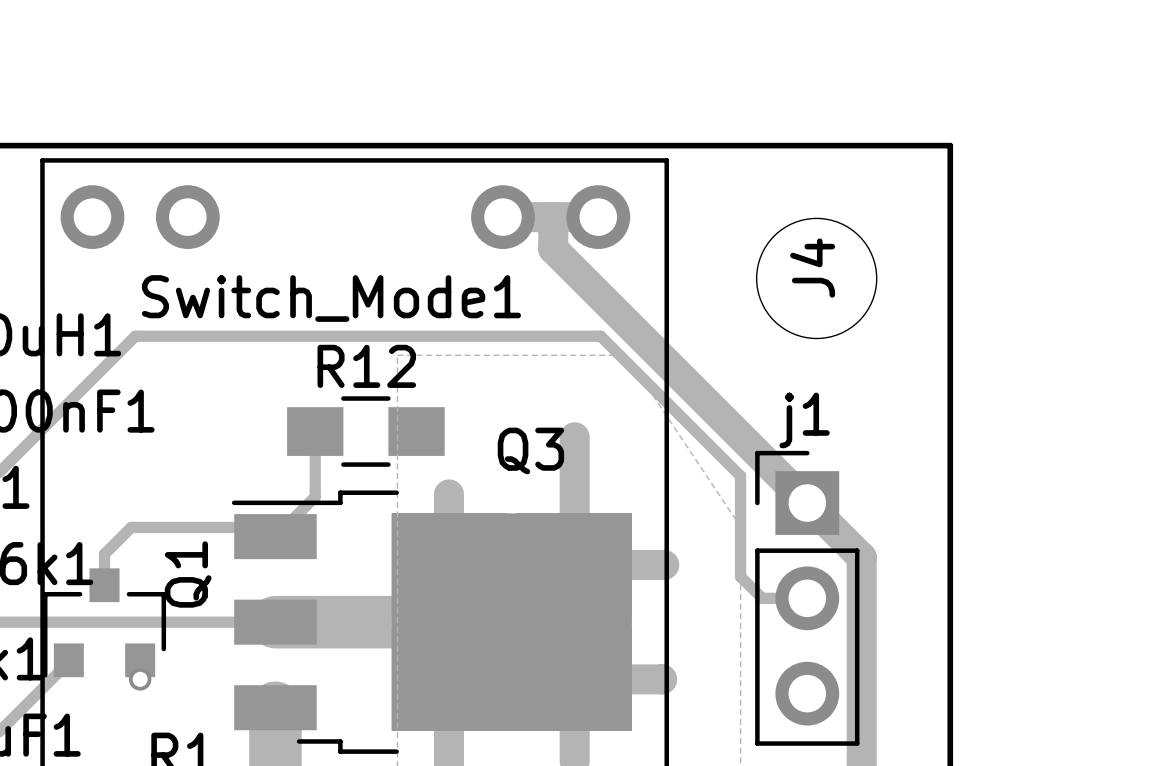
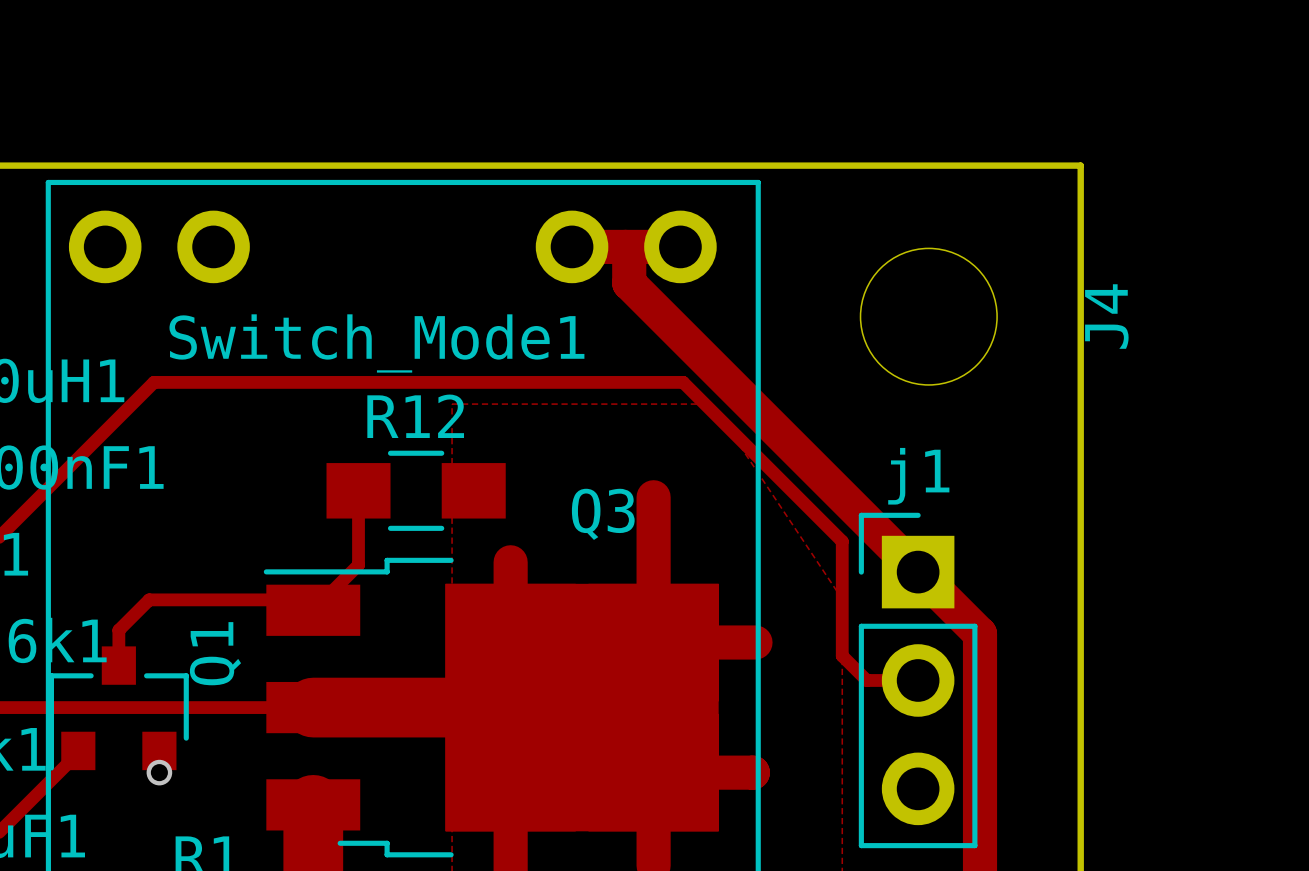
J4 name position: J4 (812, 268) -> J4 (1106, 316)

